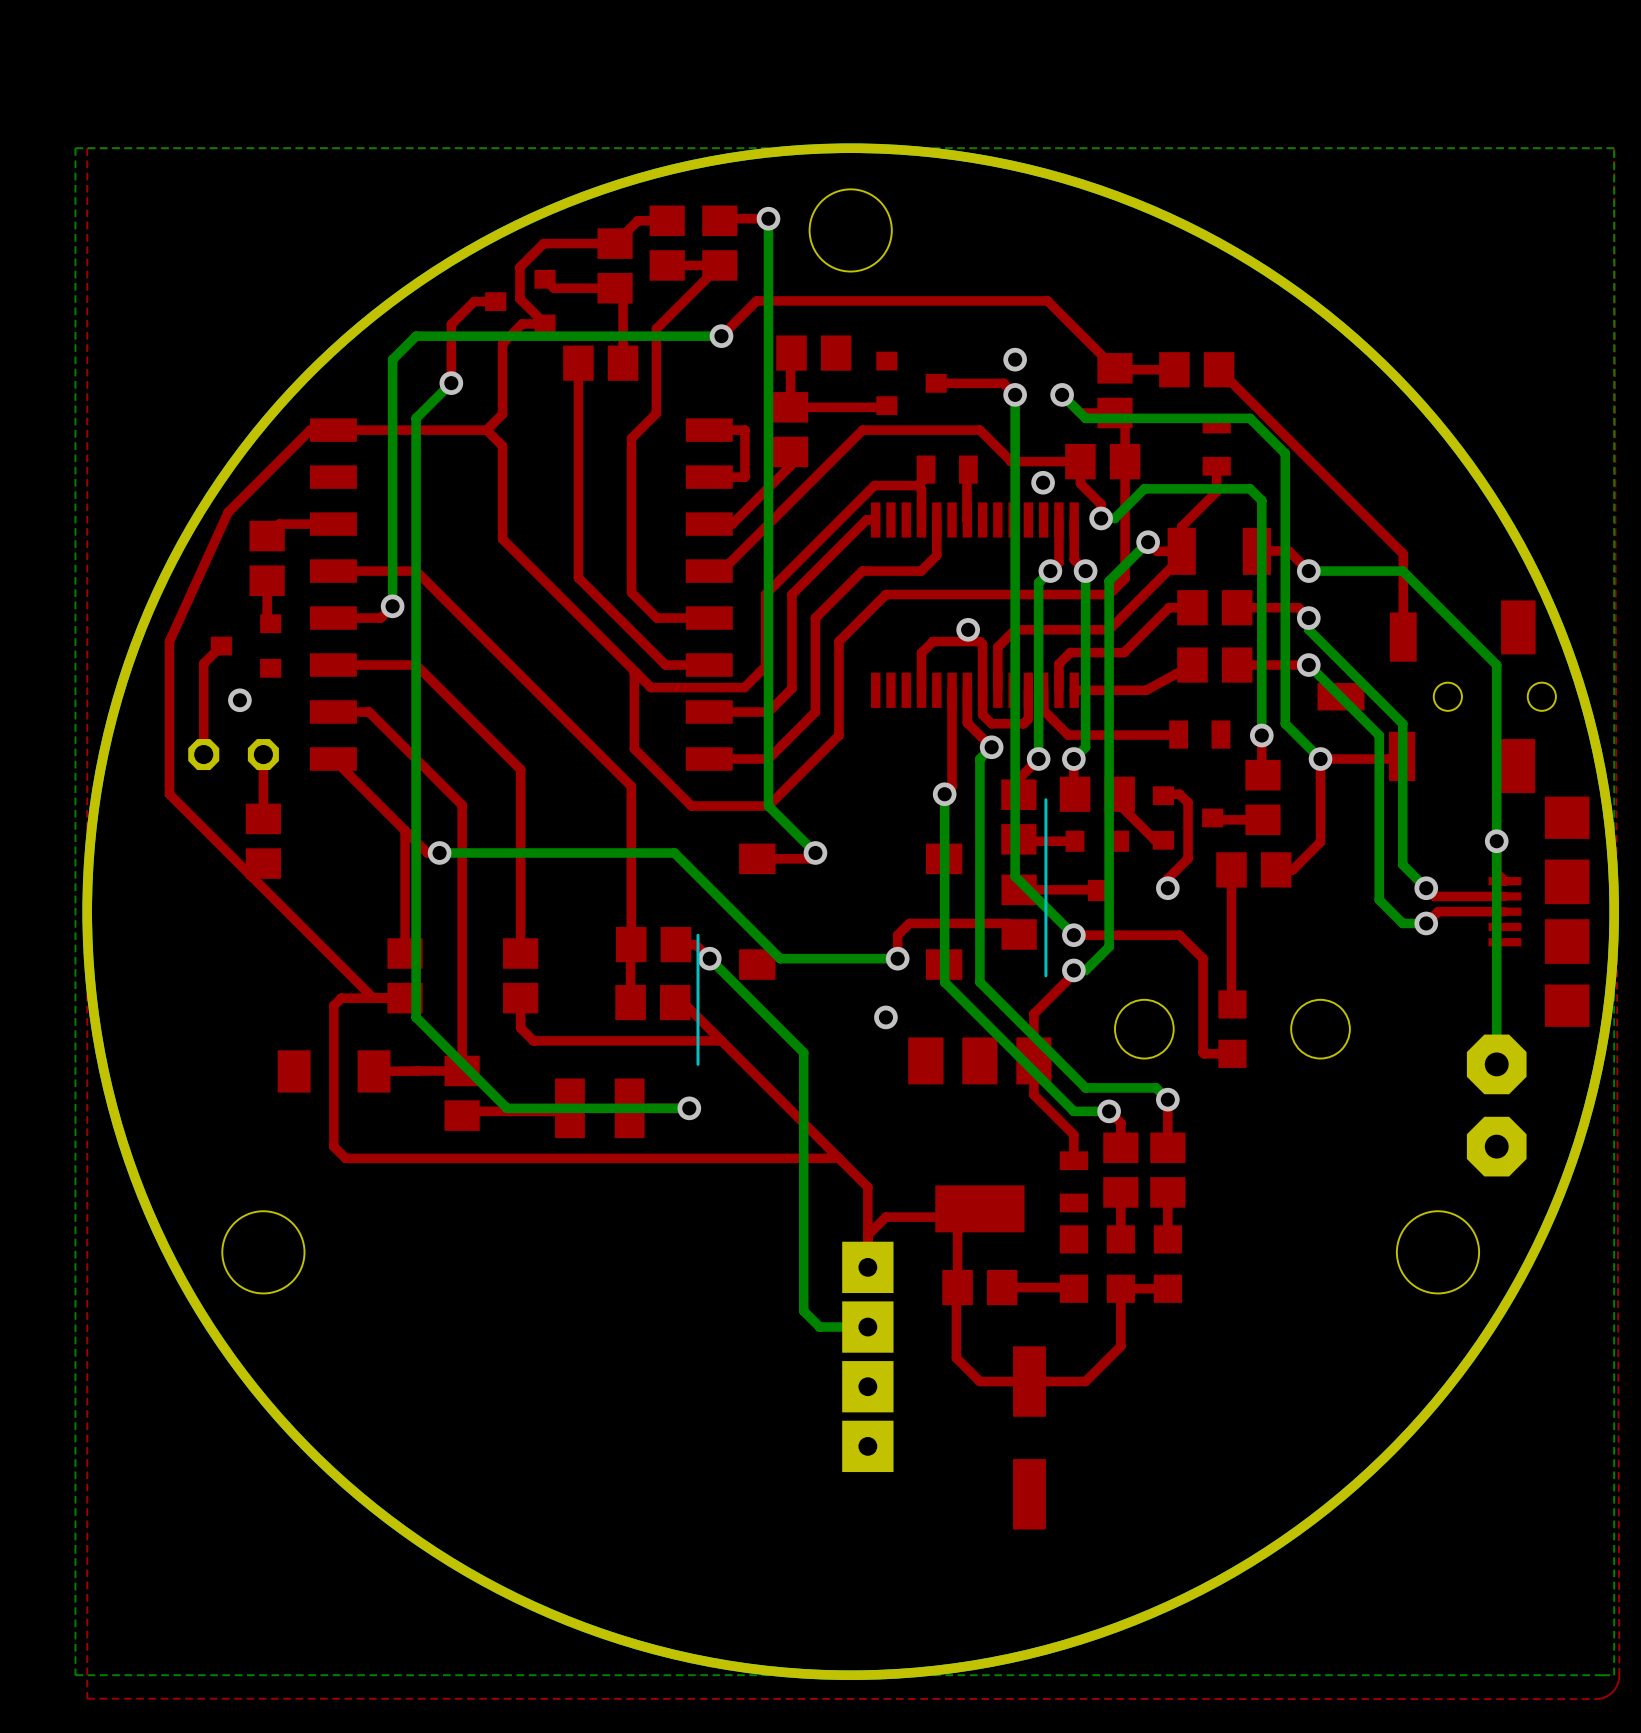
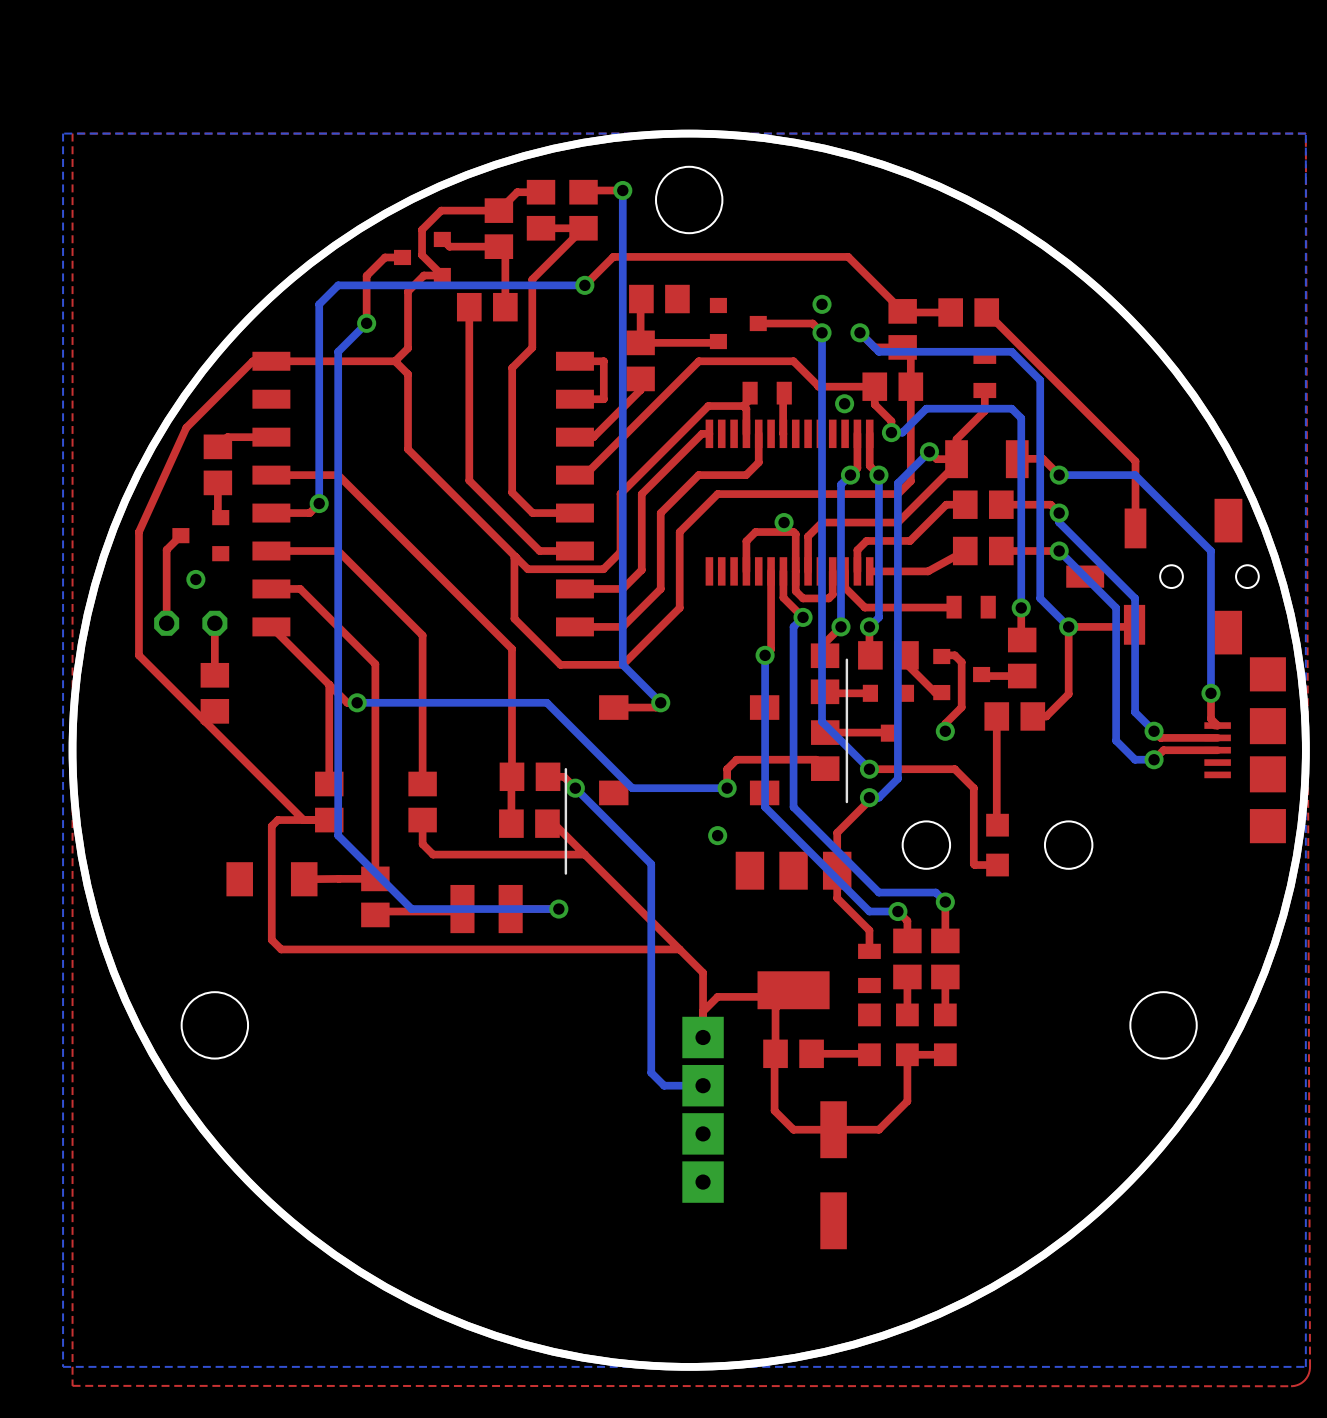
bottom track: (1496, 841) (1496, 1064) -> none
part: (1496, 1064) -> none
part: (1496, 1146) -> none

